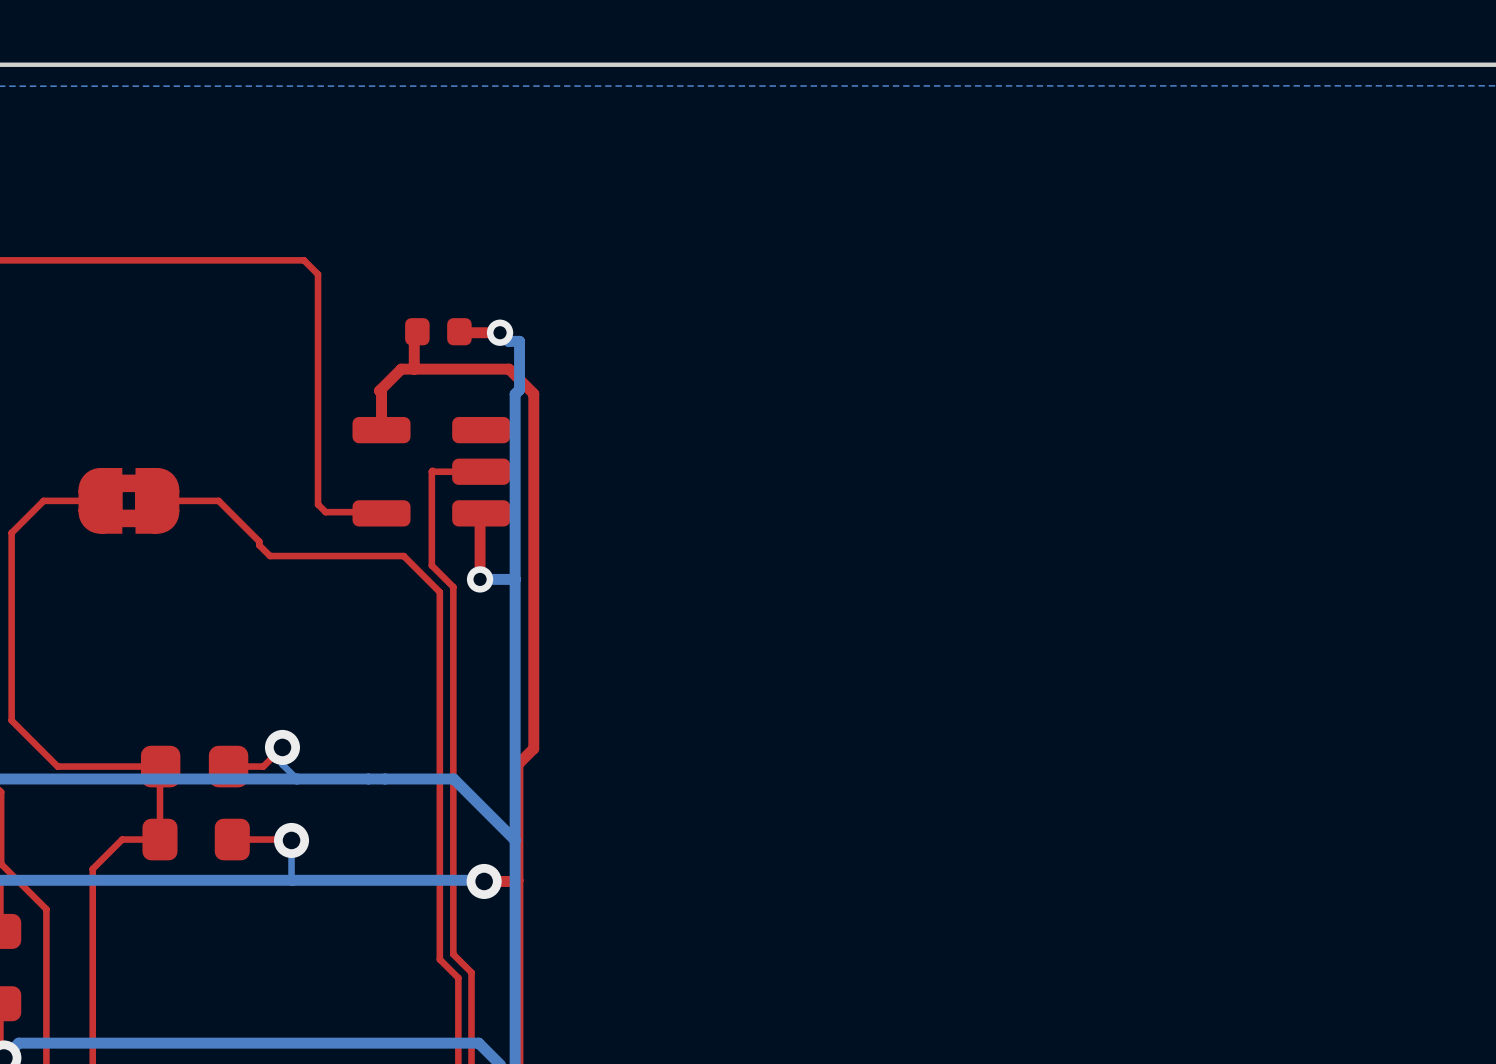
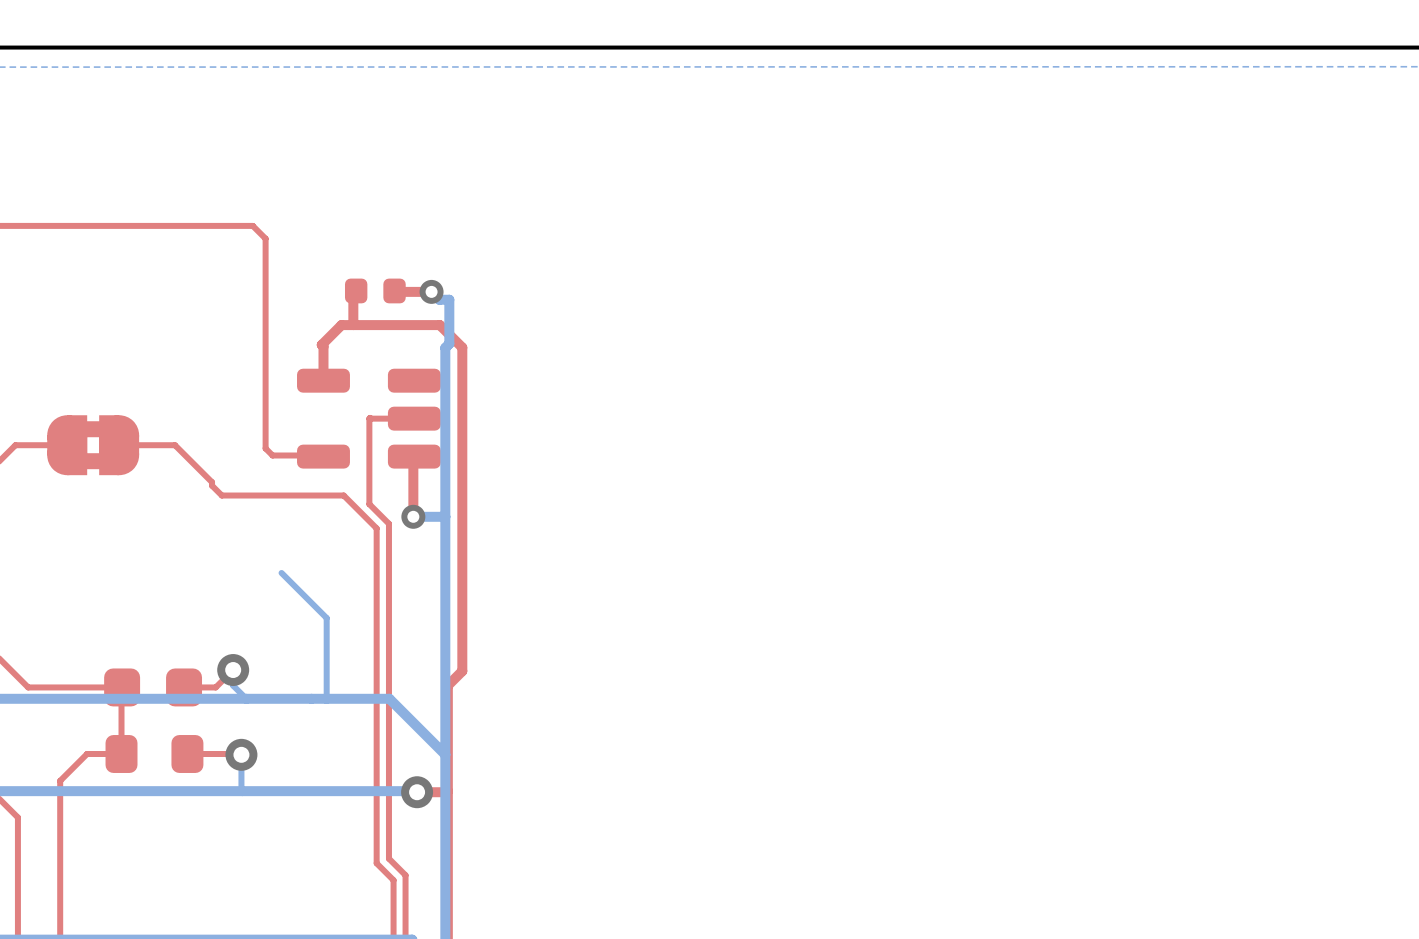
bottom track: none -> (281, 572) (326, 618) (326, 698)

